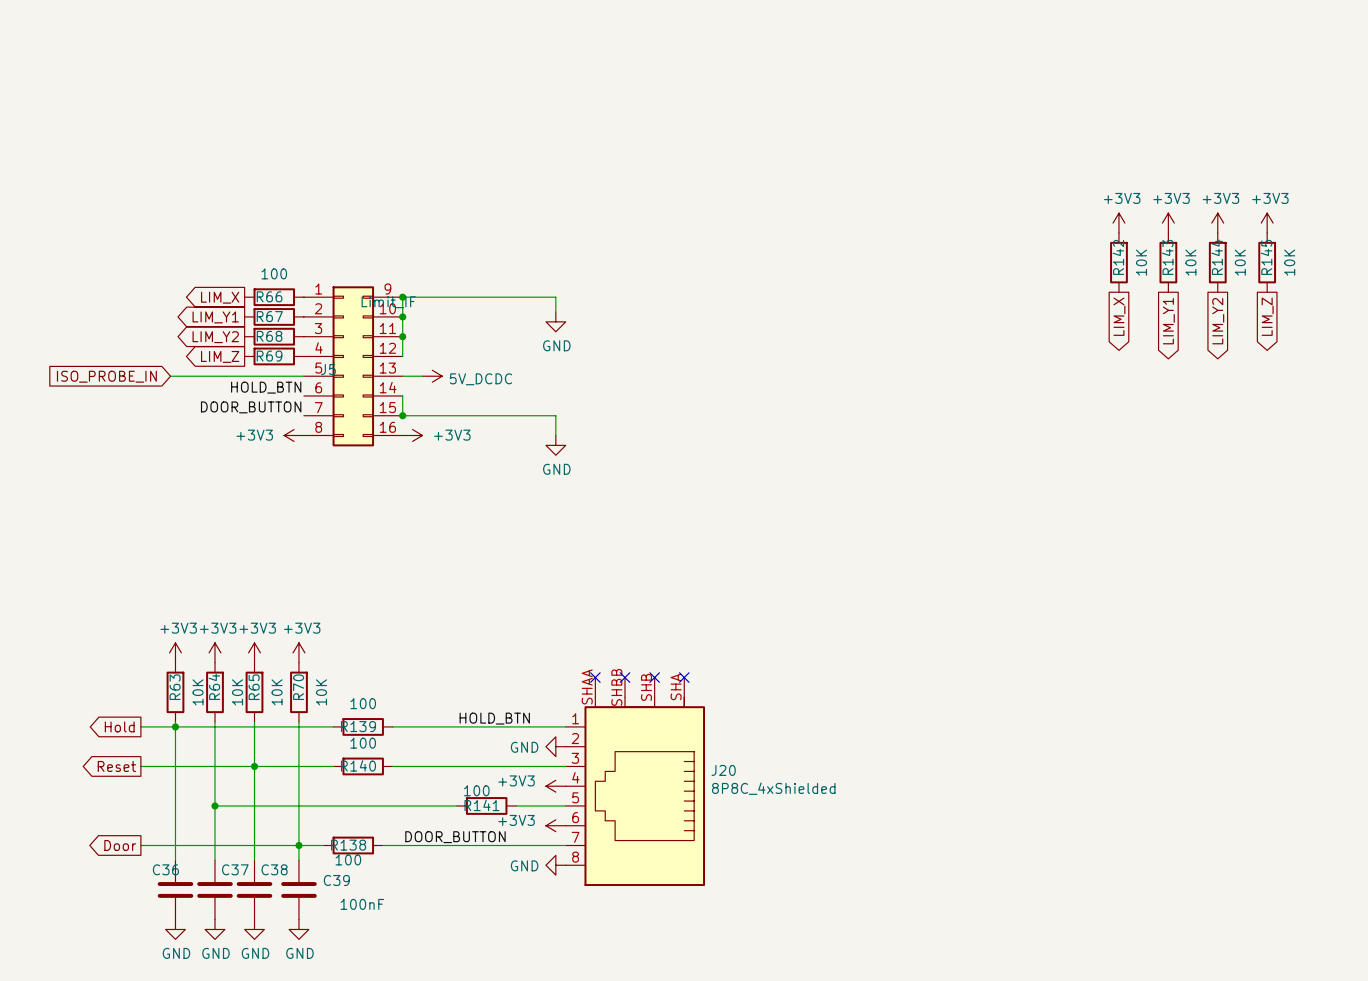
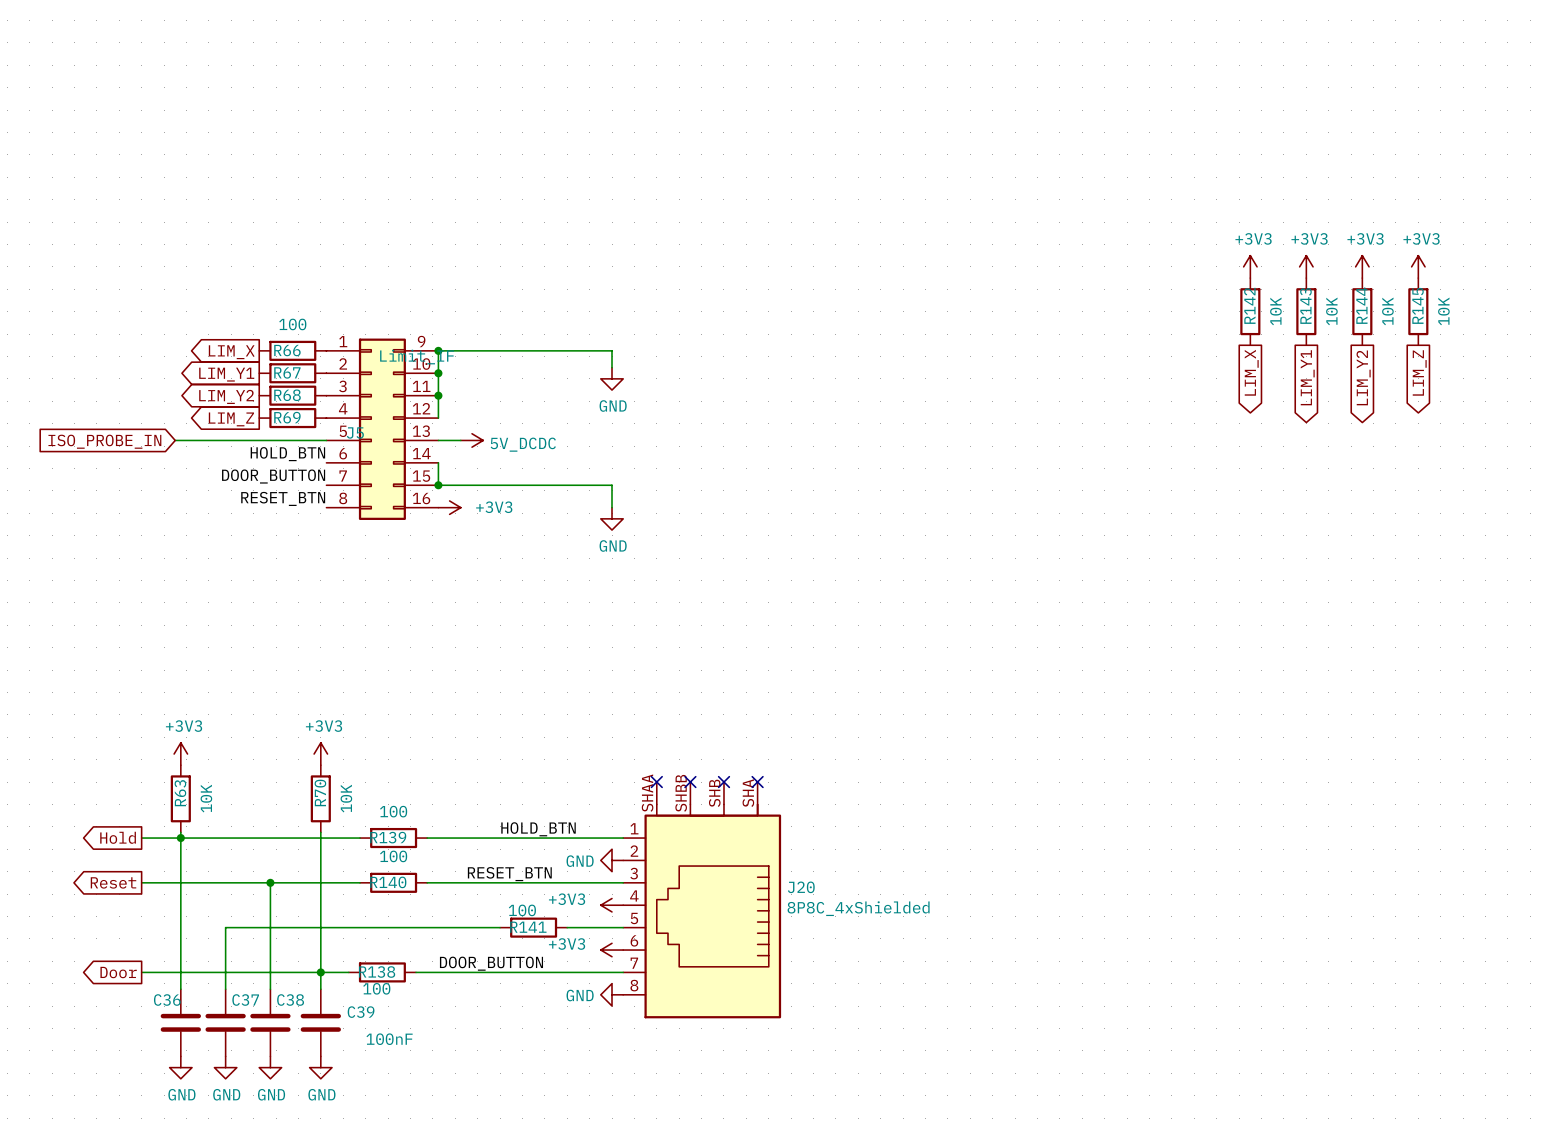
label: none -> RESET_BTN (283, 498)
power symbol: +3V3 (294, 435) -> none
power symbol: +3V3 (214, 652) -> none
power symbol: +3V3 (254, 652) -> none
R64: 10K (214, 692) -> none
R65: 10K (254, 692) -> none
wire: (214, 722) (214, 805) -> none
wire: (254, 722) (254, 766) -> none
label: none -> RESET_BTN (509, 874)
junction: (214, 805) -> none

